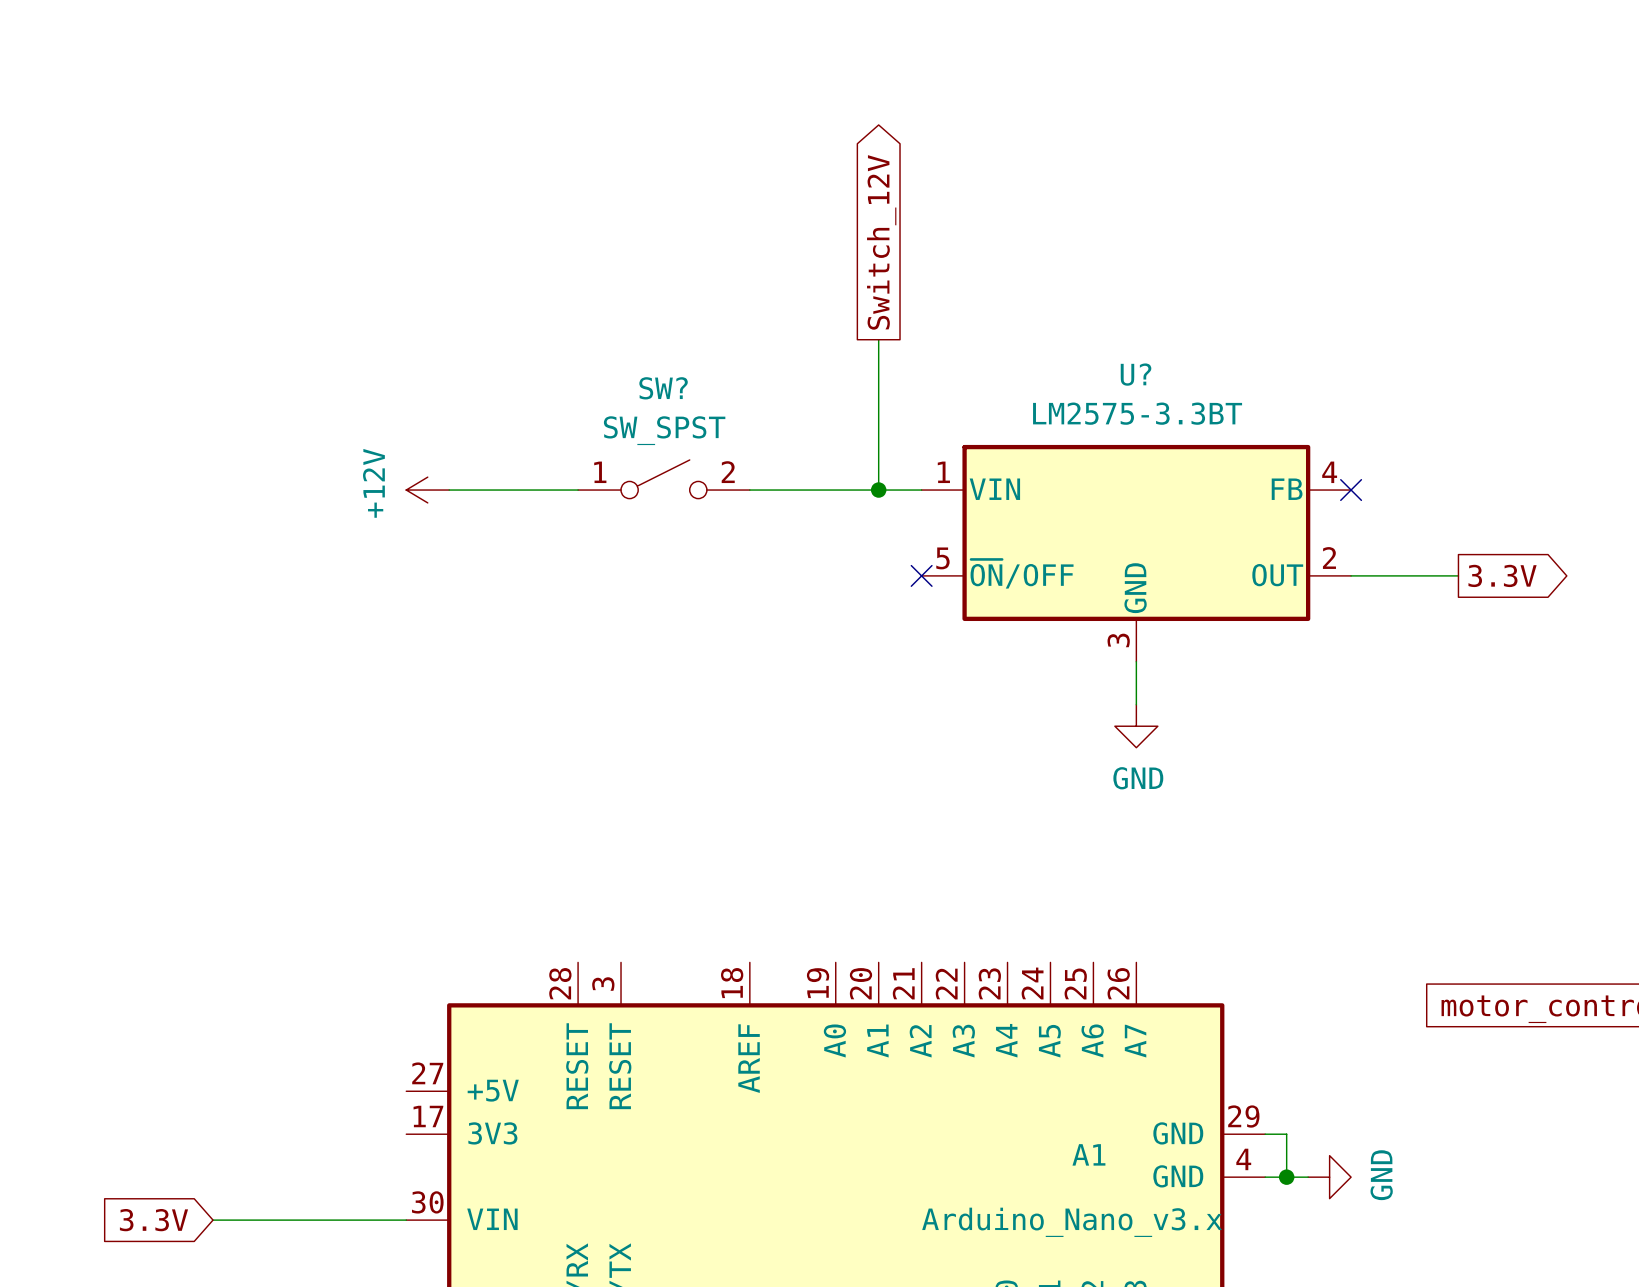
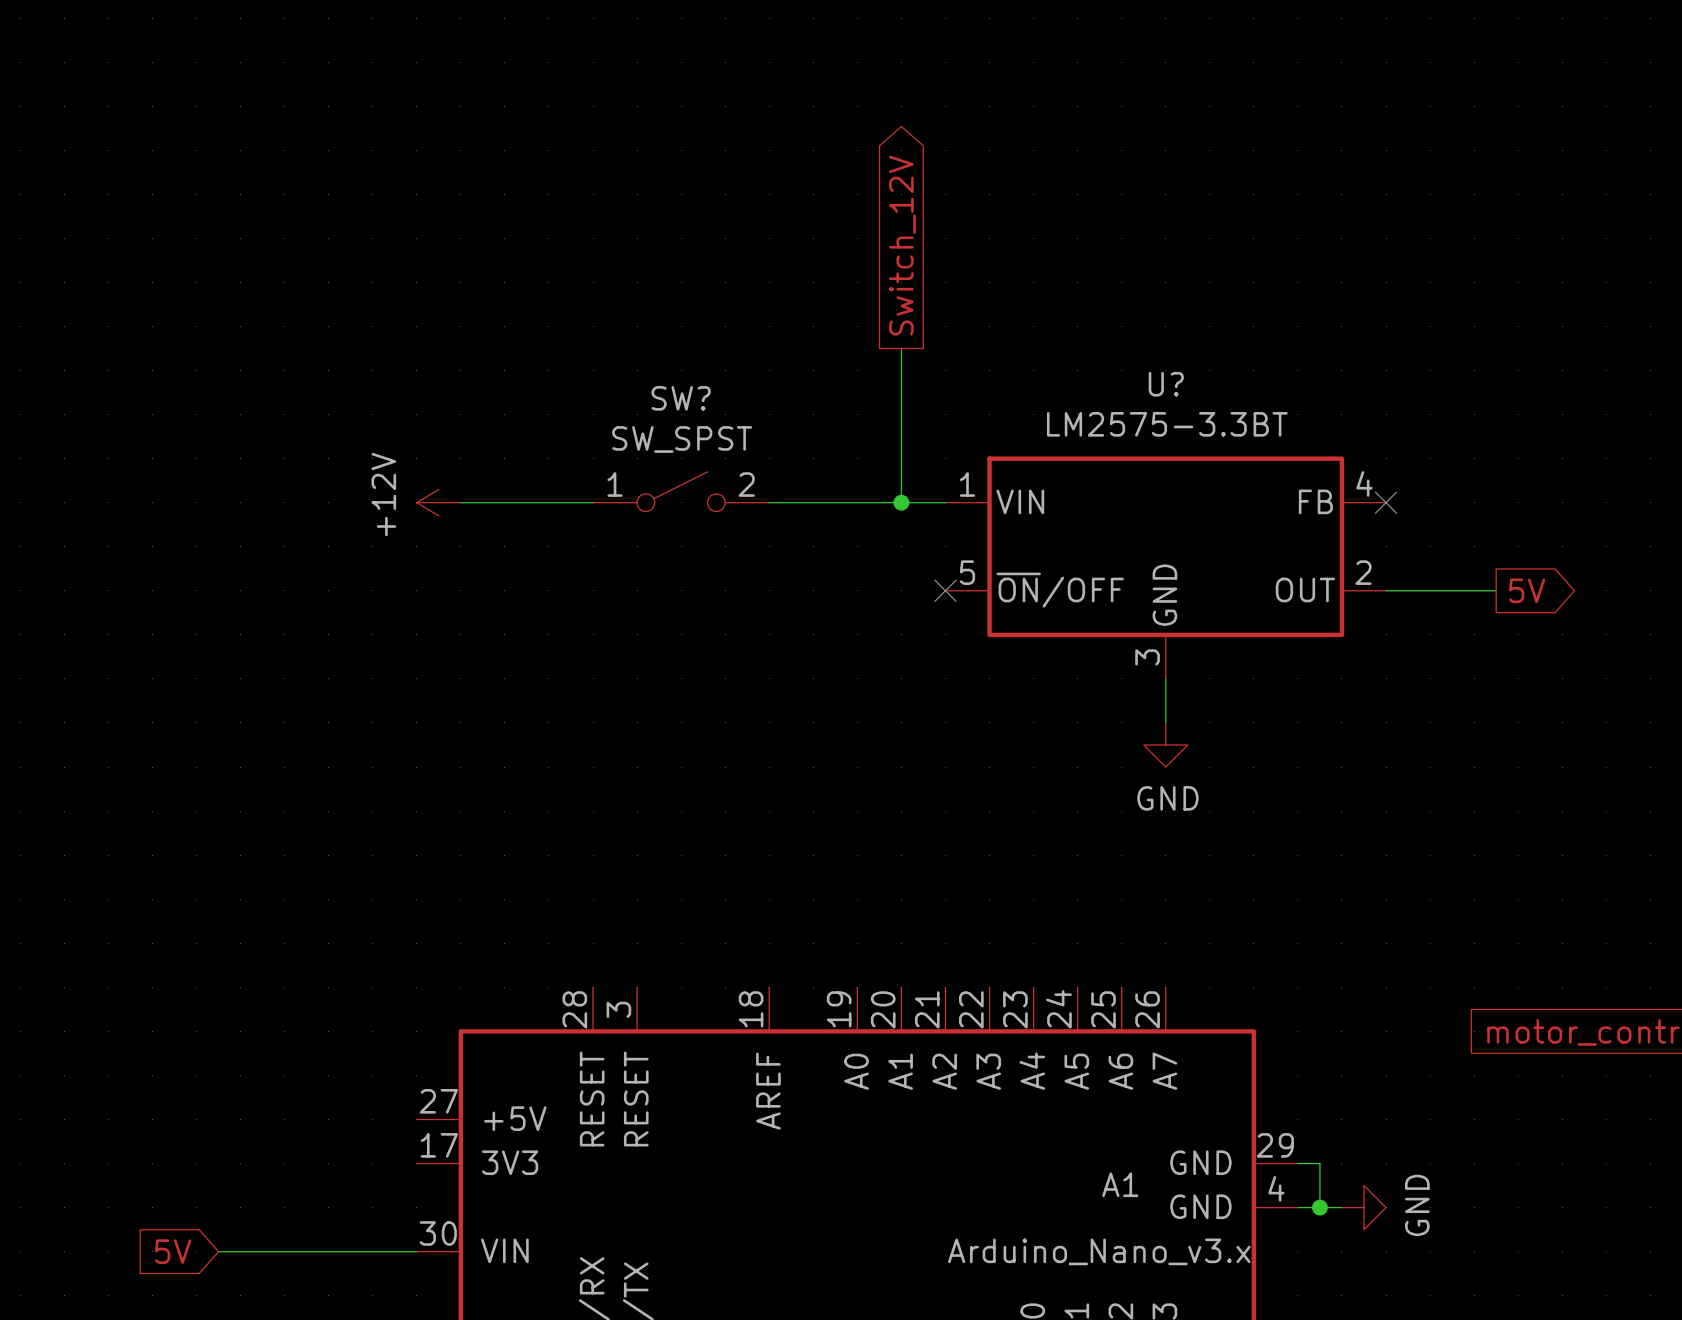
global label: 3.3V (1502, 575) -> 5V (1527, 590)
global label: 3.3V (153, 1220) -> 5V (173, 1251)

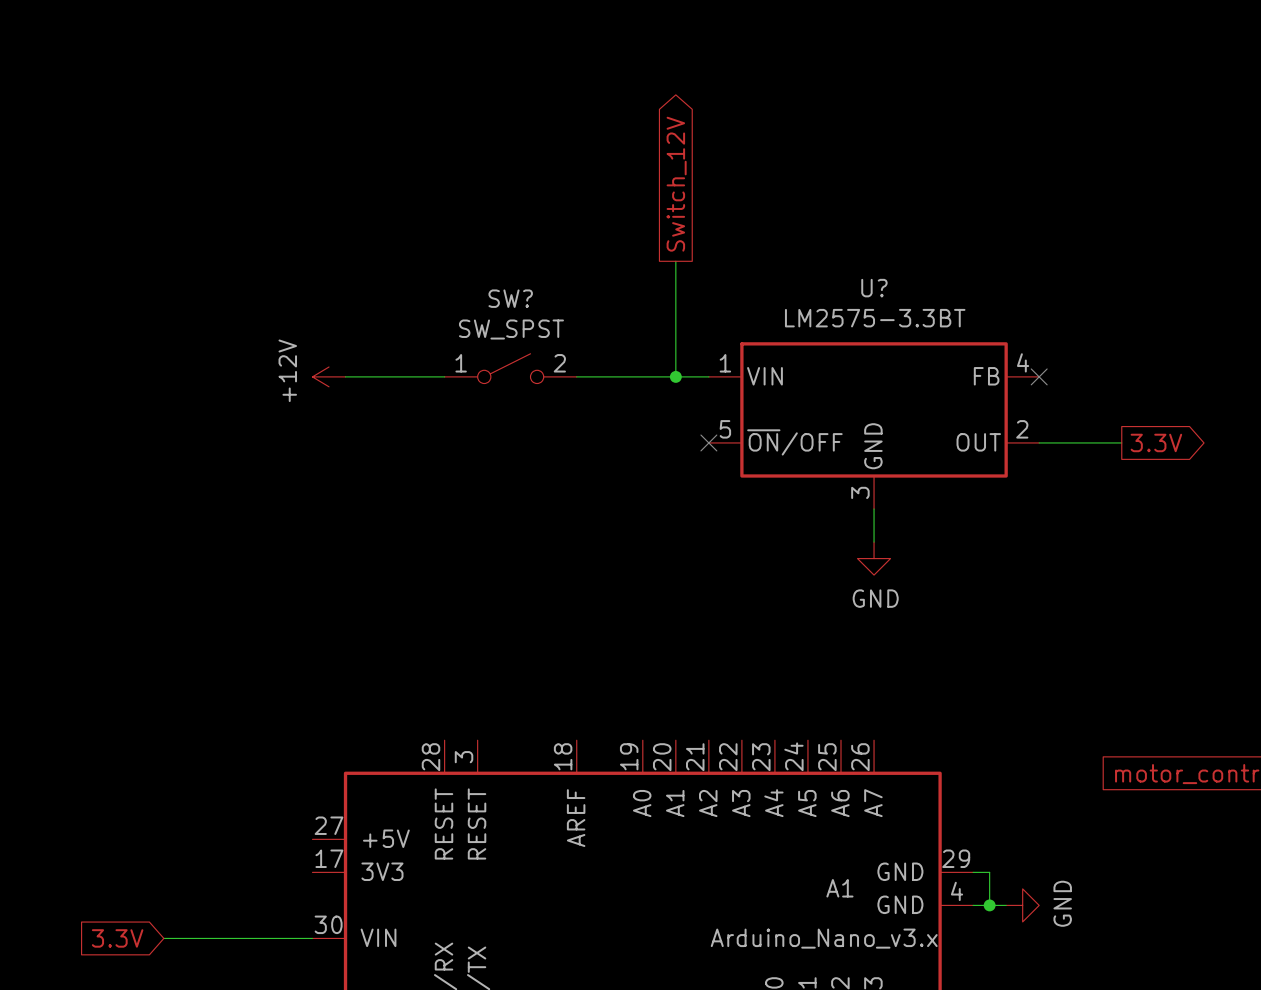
global label: 5V (1527, 590) -> 3.3V (1156, 442)
global label: 5V (173, 1251) -> 3.3V (117, 938)

